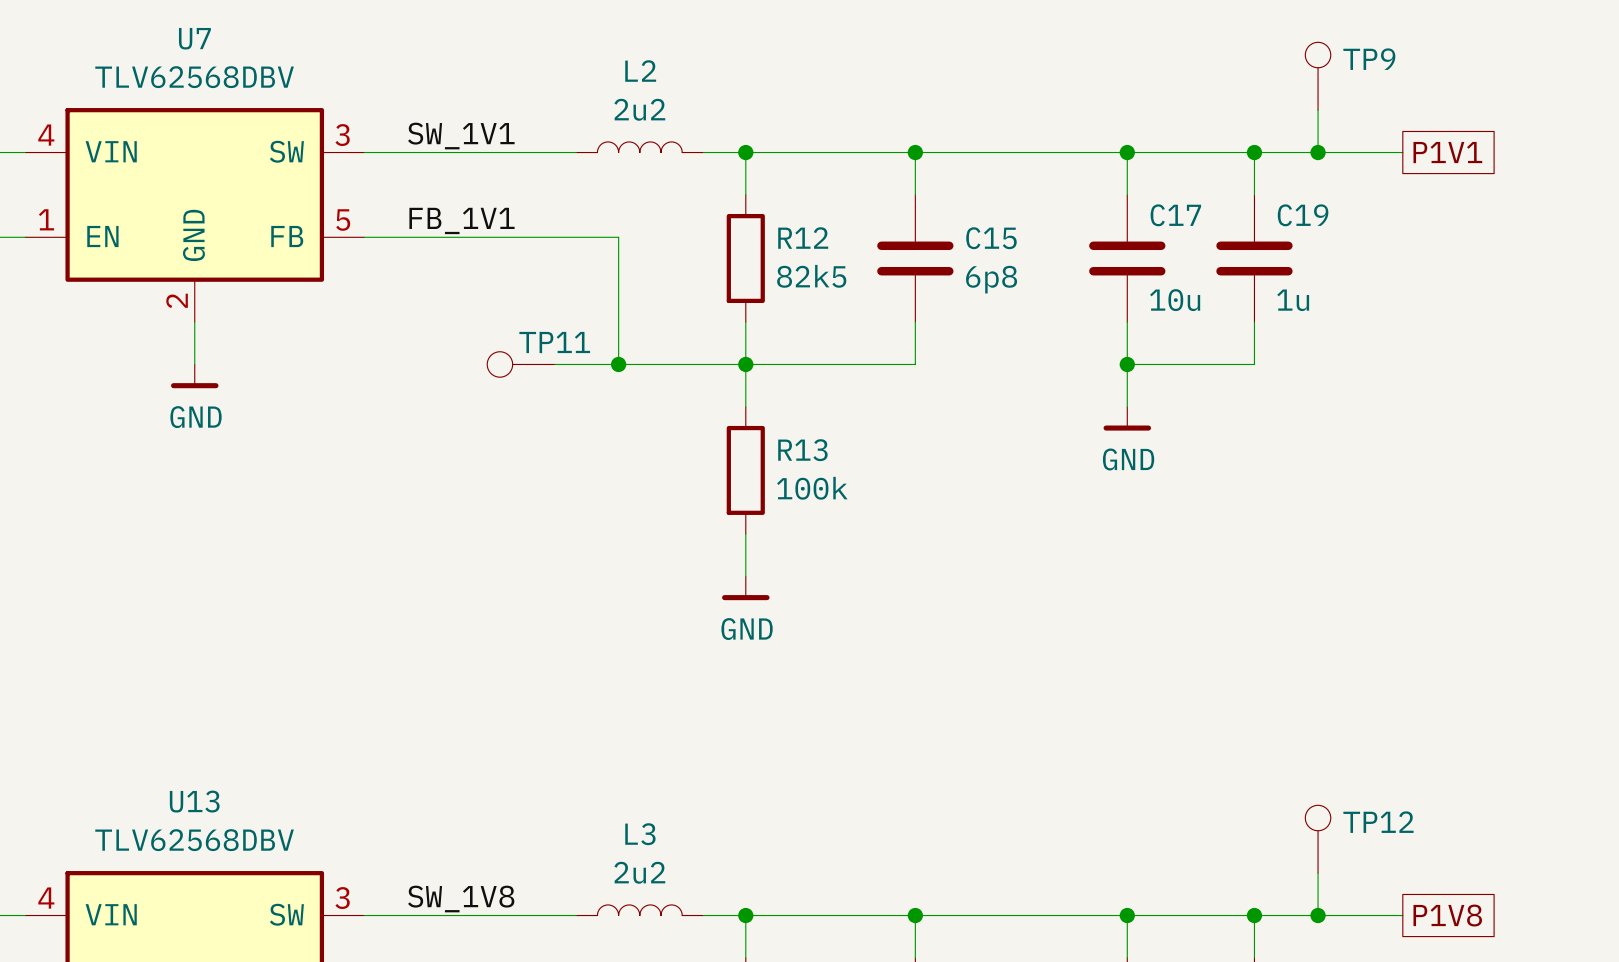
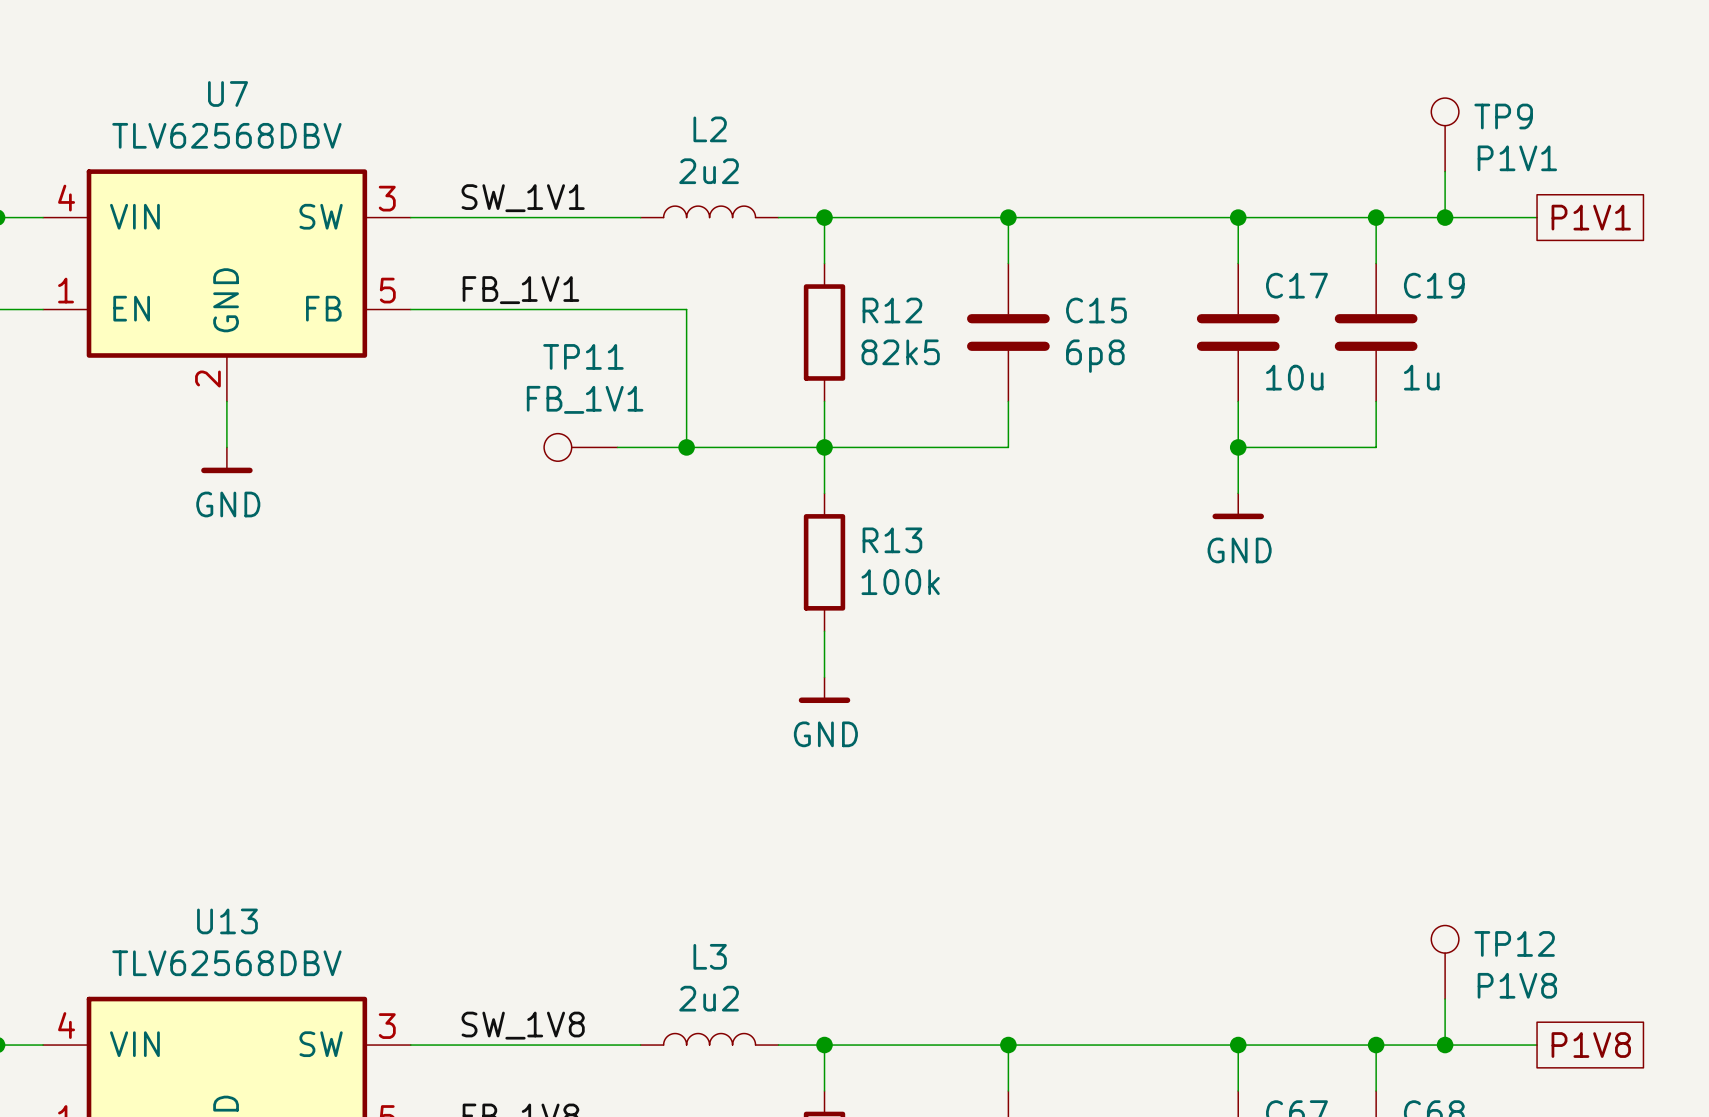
TP9 value: none -> P1V1 (1517, 158)
TP11 value: none -> FB_1V1 (585, 399)
TP11 name position: TP11 (554, 342) -> TP11 (583, 356)
TP12 value: none -> P1V8 (1517, 985)

